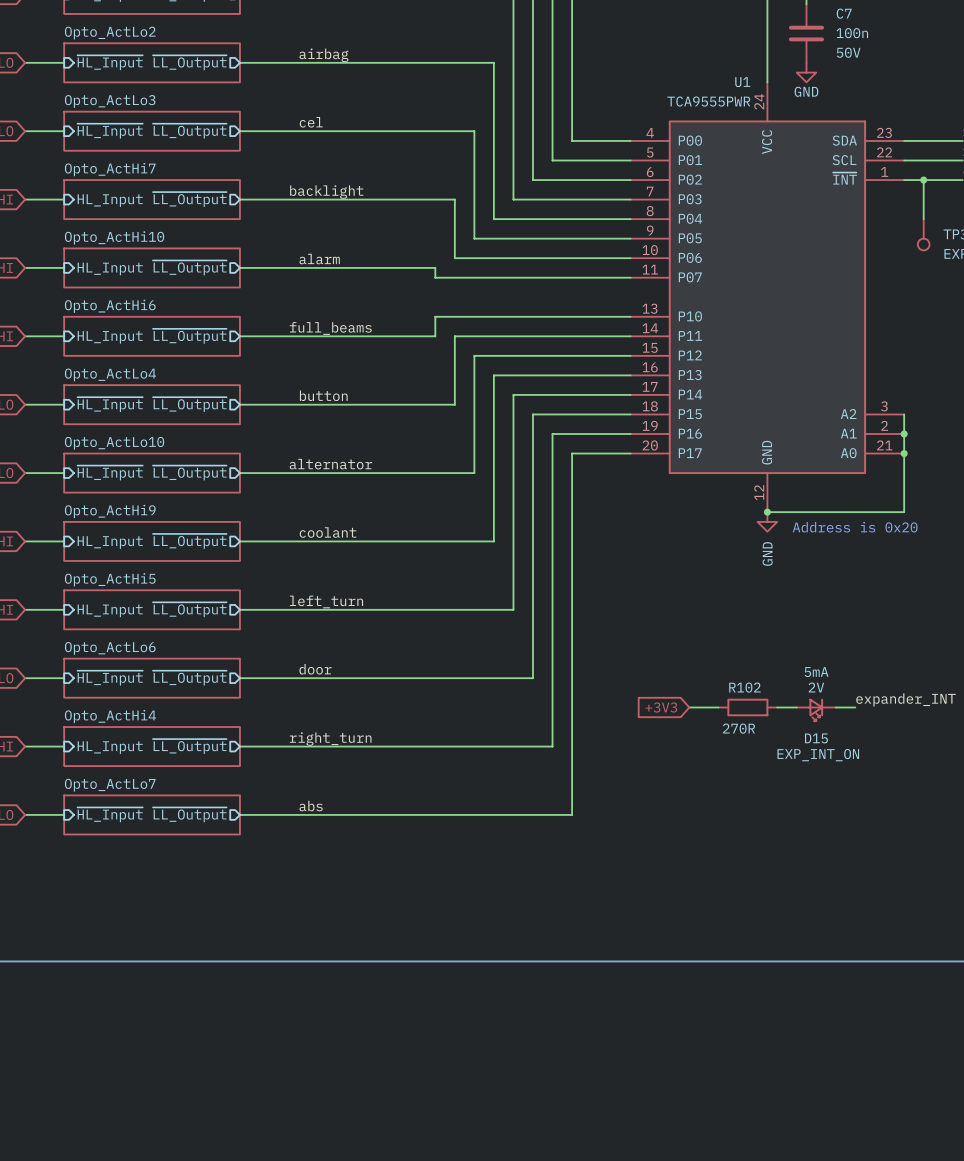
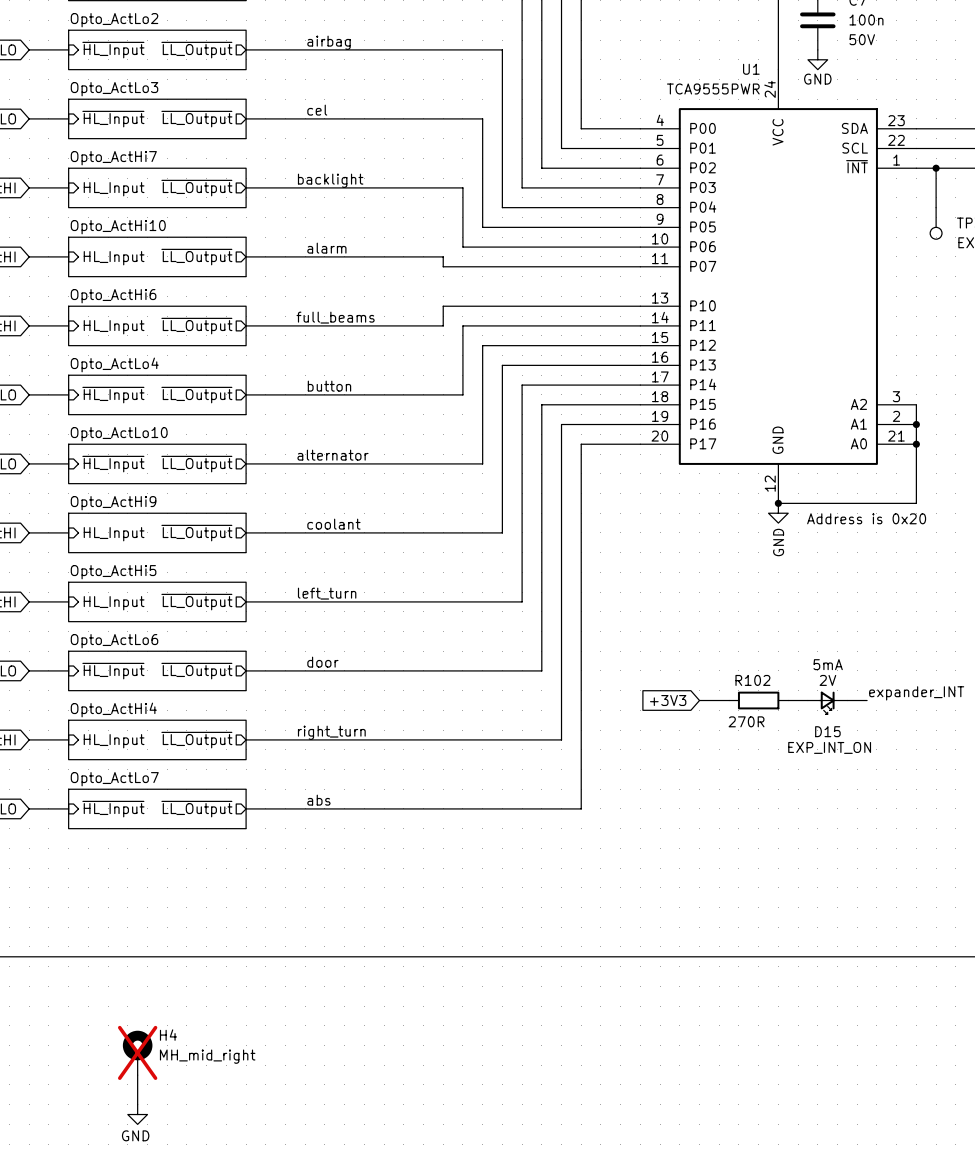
H4: none -> MH_mid_right (137, 1052)
wire: none -> (137, 1075) (137, 1104)
power symbol: none -> GND (137, 1114)

